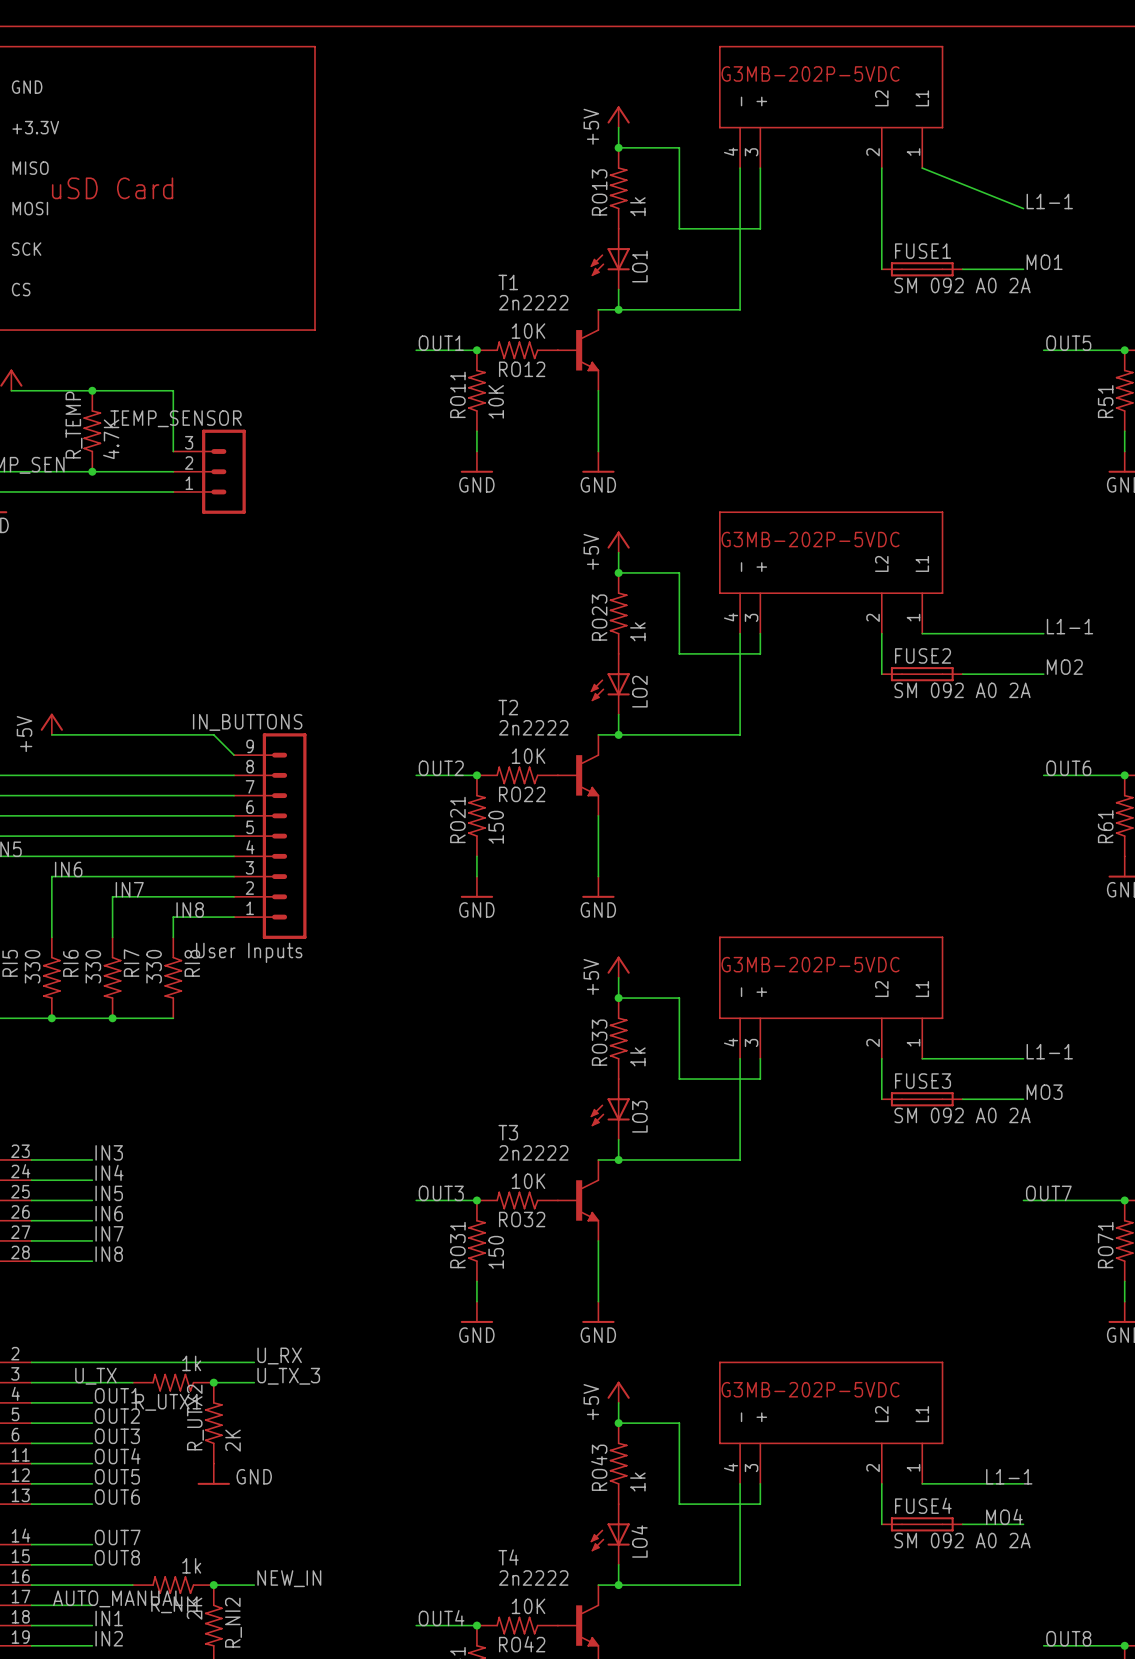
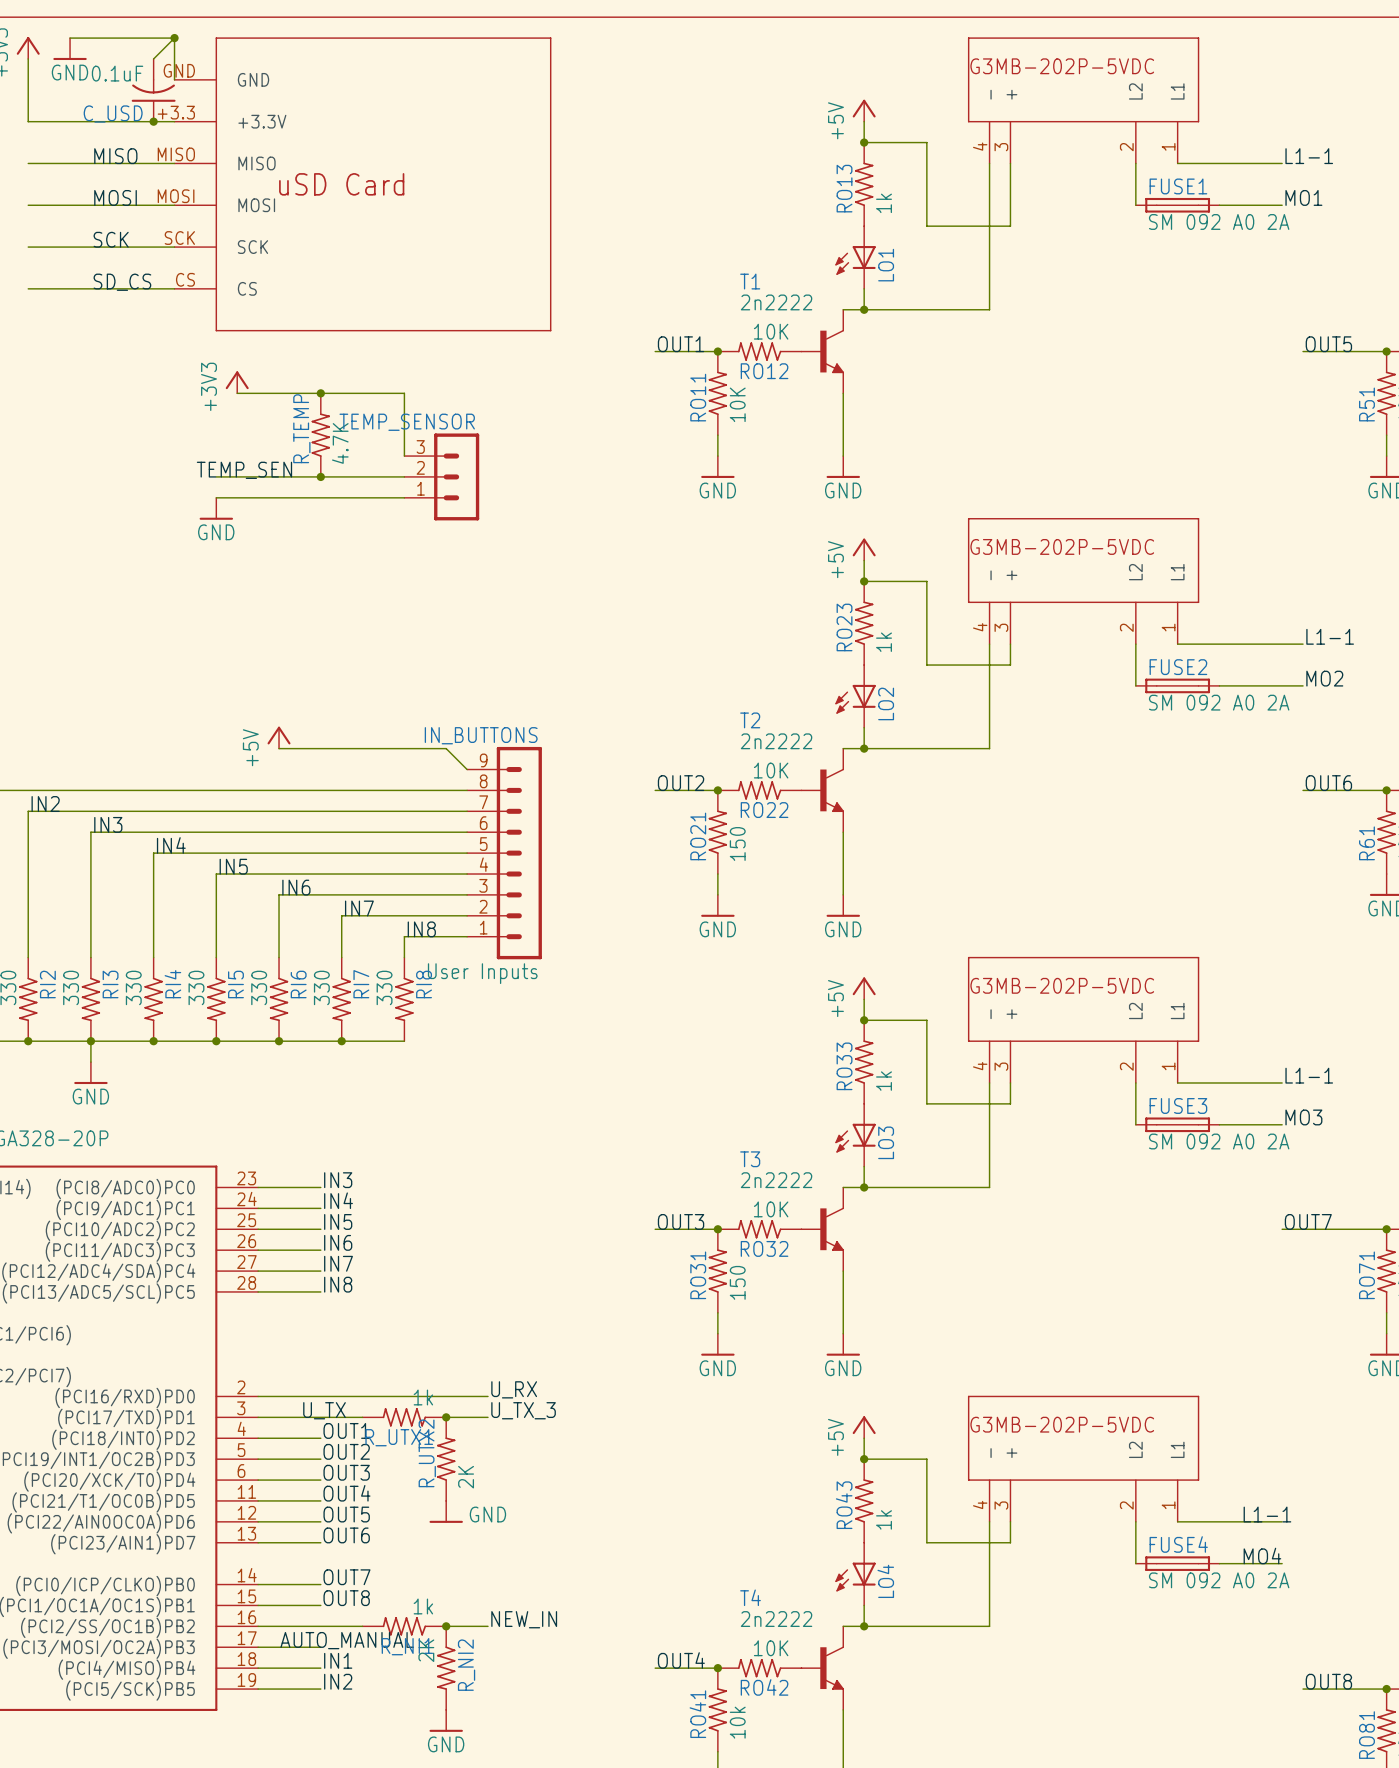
label: none -> L1-1 (1309, 156)
wire: (922, 168) (1023, 208) -> (1177, 163) (1282, 163)
label: L1-1 (1049, 201) -> MO1 (1303, 197)
wire: (881, 208) (881, 269) -> none
label: MO1 (1044, 262) -> none
FUSE1 position: (922, 269) -> (1177, 205)
wire: (962, 269) (1023, 269) -> (1219, 205) (1282, 205)

